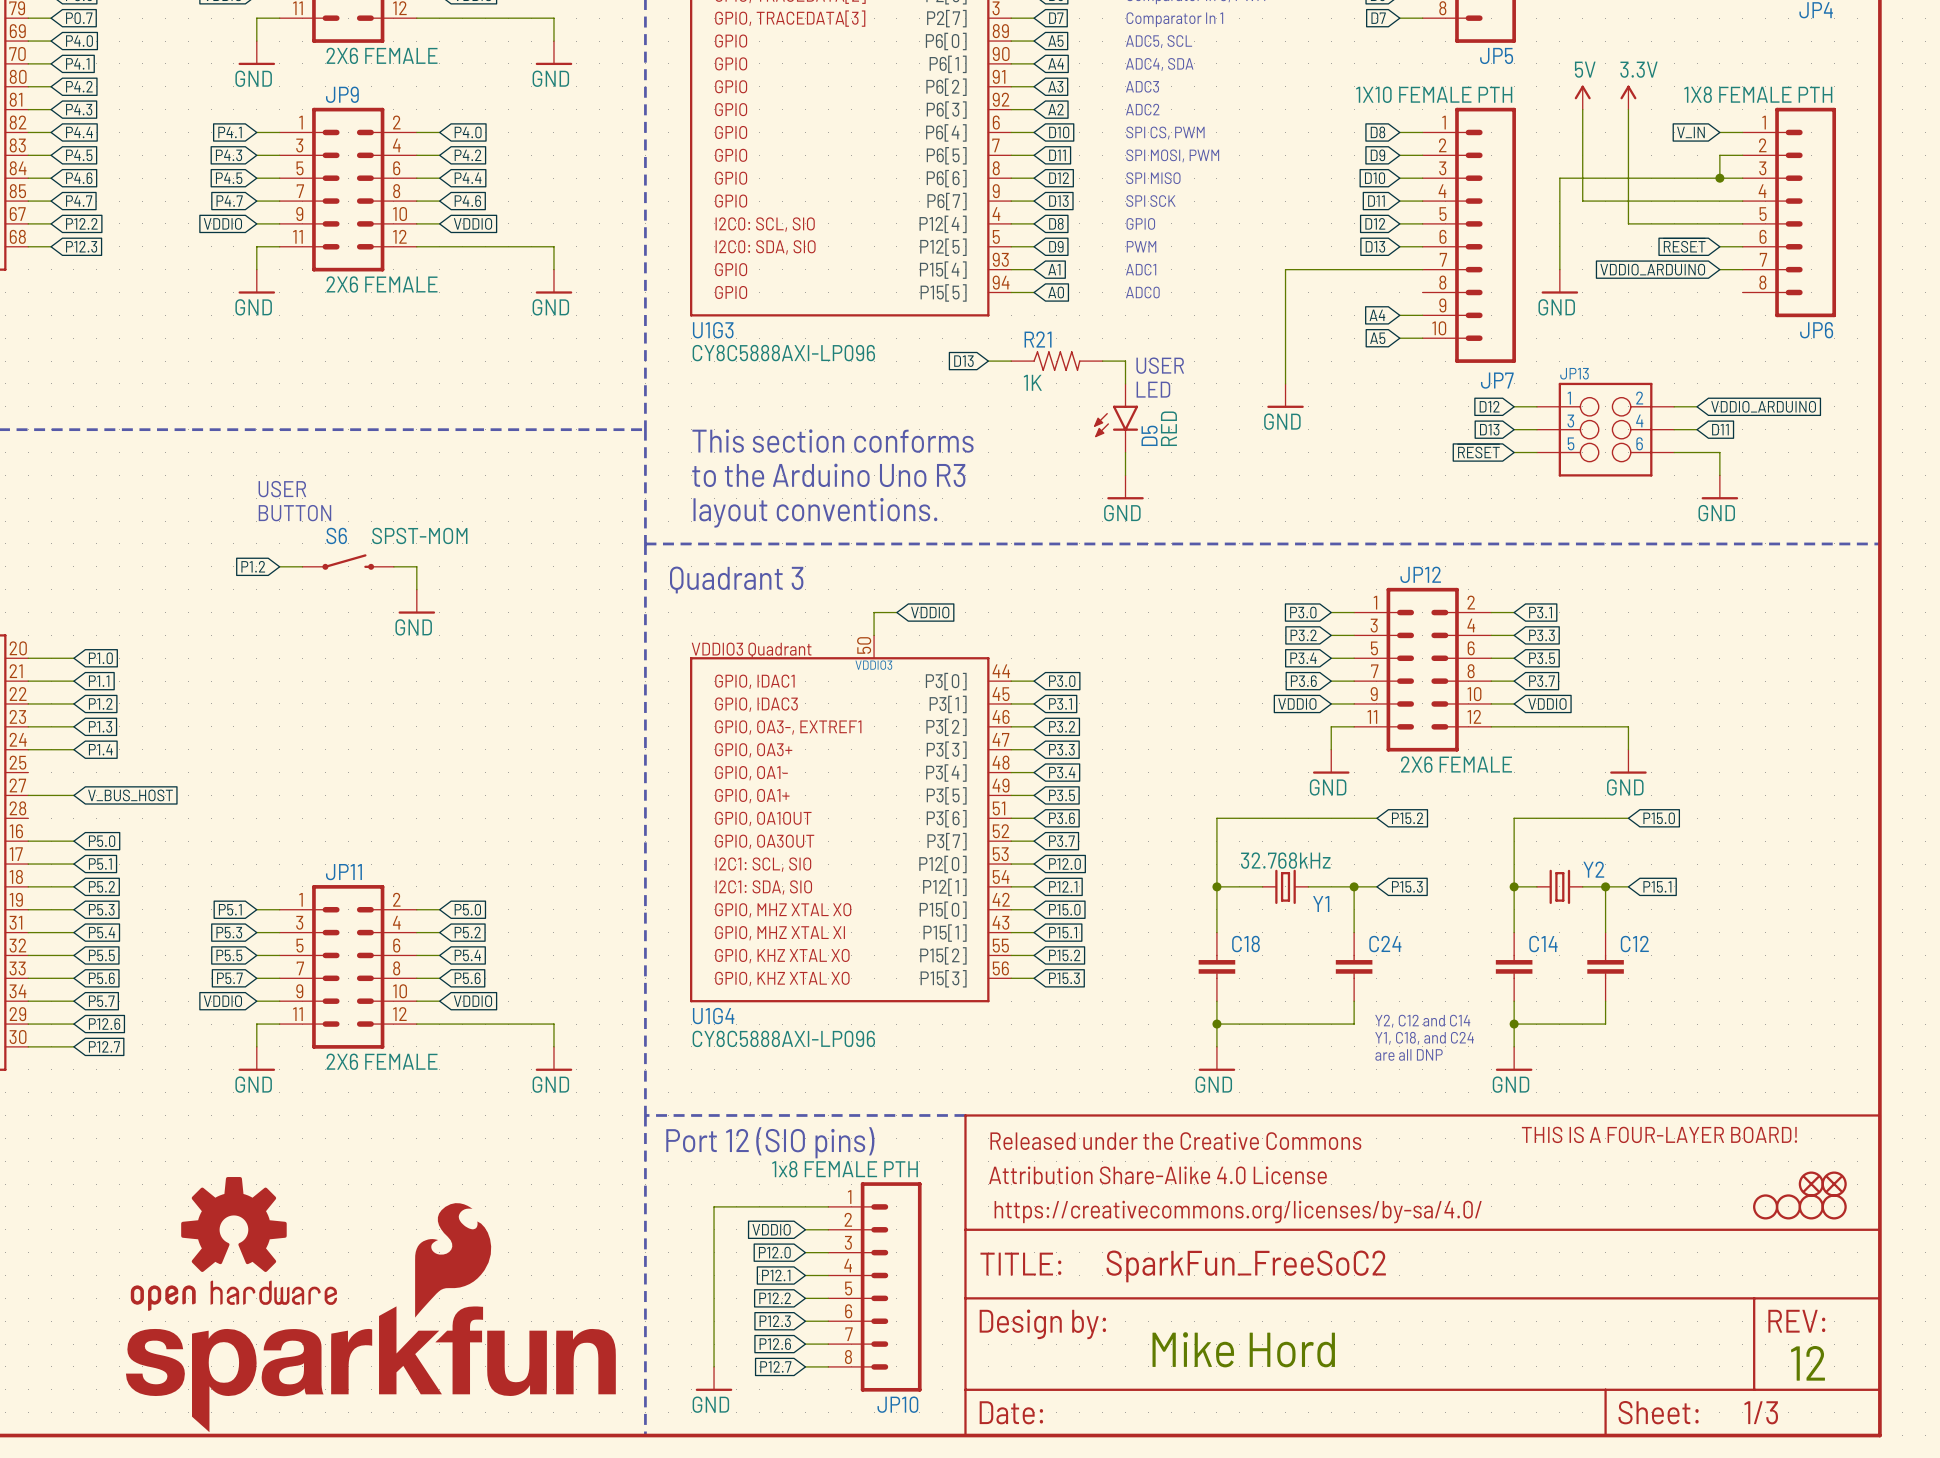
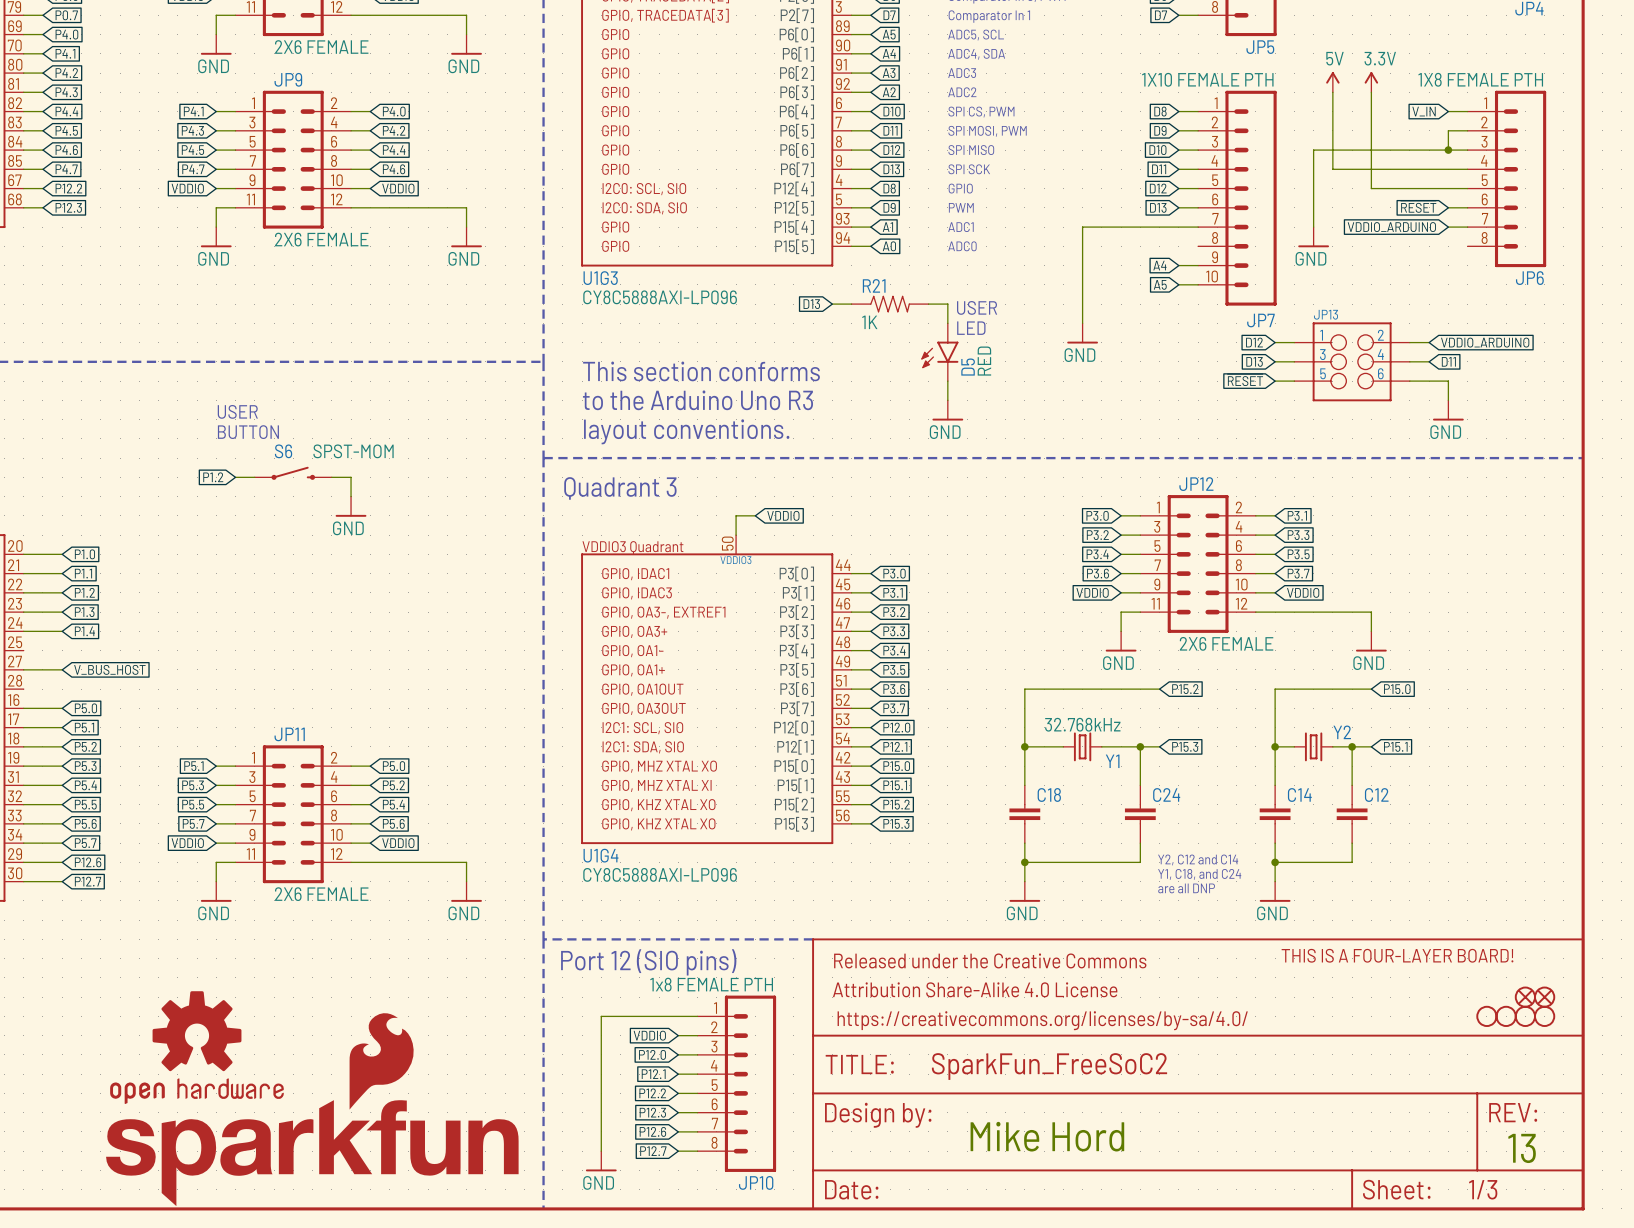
text: 12 (1807, 1363) -> 13 (1522, 1148)

